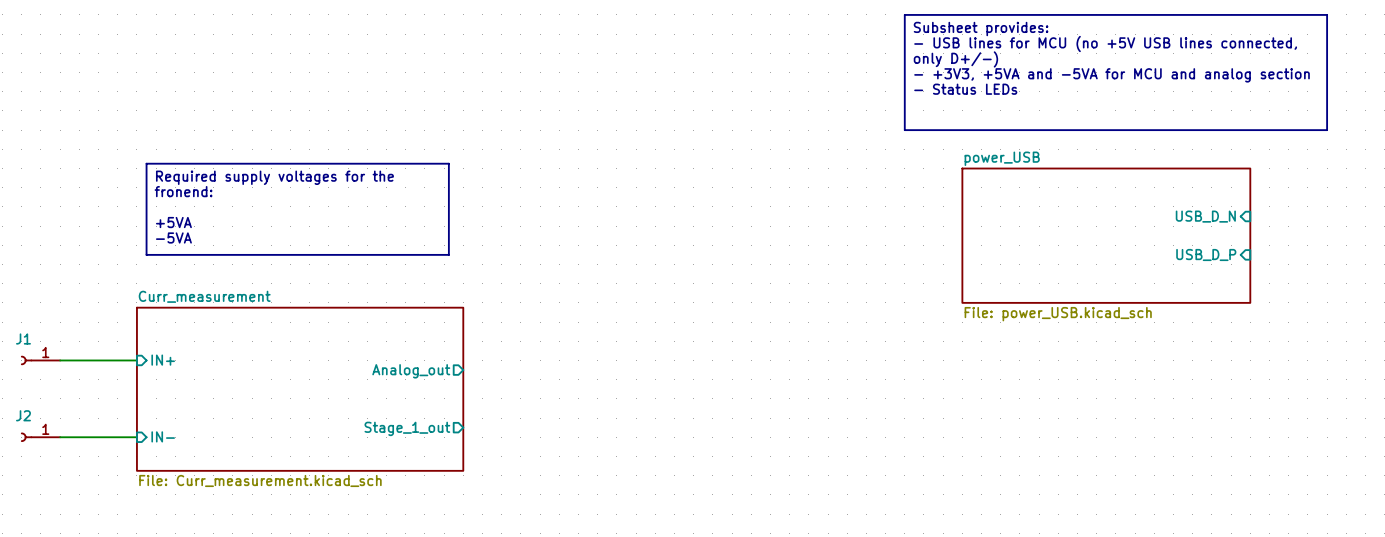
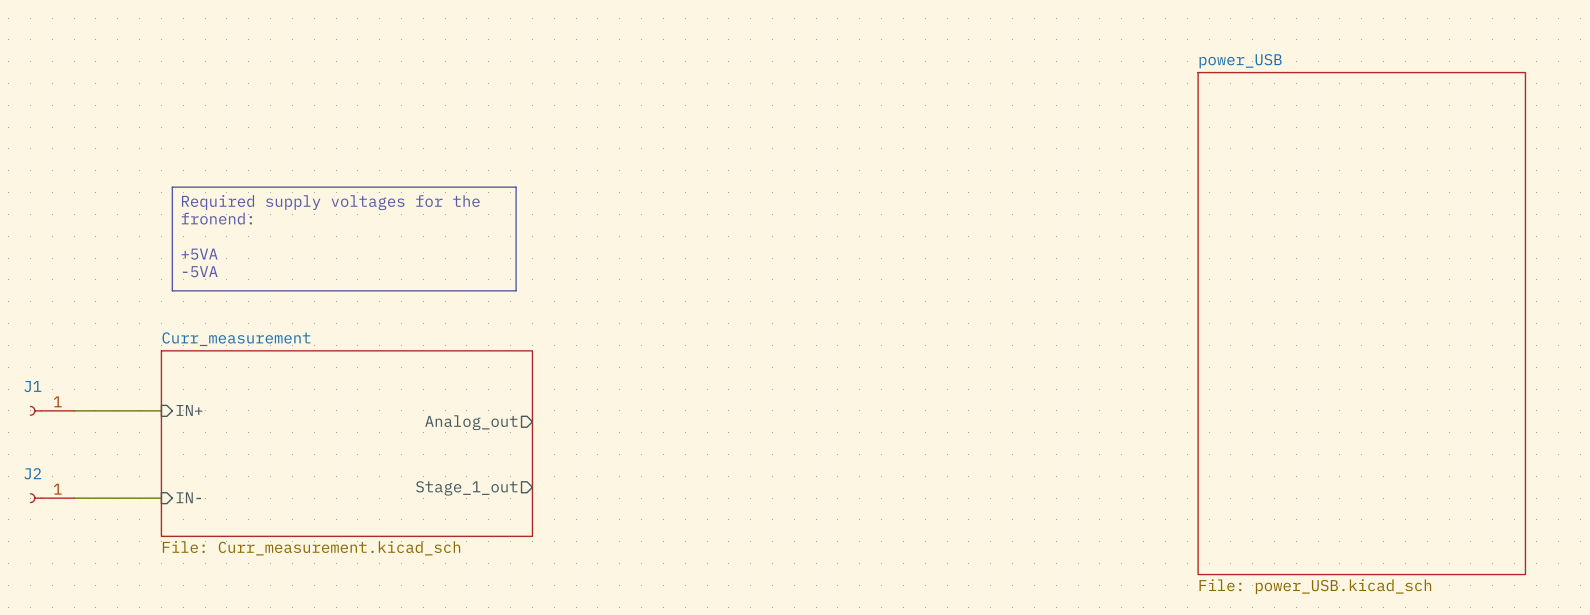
line: (904, 14) (1327, 14) (1327, 130) (904, 130) (904, 14) -> none
text: Subsheet provides: (981, 29) -> none
text: - USB lines for MCU (no +5V USB lines connected, (1105, 44) -> none
text: only D+/-) (955, 59) -> none
text: - +3V3, +5VA and -5VA for MCU and analog section (1112, 75) -> none
text: - Status LEDs (965, 89) -> none
sheet pin: USB_D_N (1205, 216) -> none
sheet power_USB: File: power_USB.kicad_sch (1106, 235) -> none
sheet pin: USB_D_P (1206, 254) -> none
sheet power_USB: none -> File: power_USB.kicad_sch (1361, 323)

